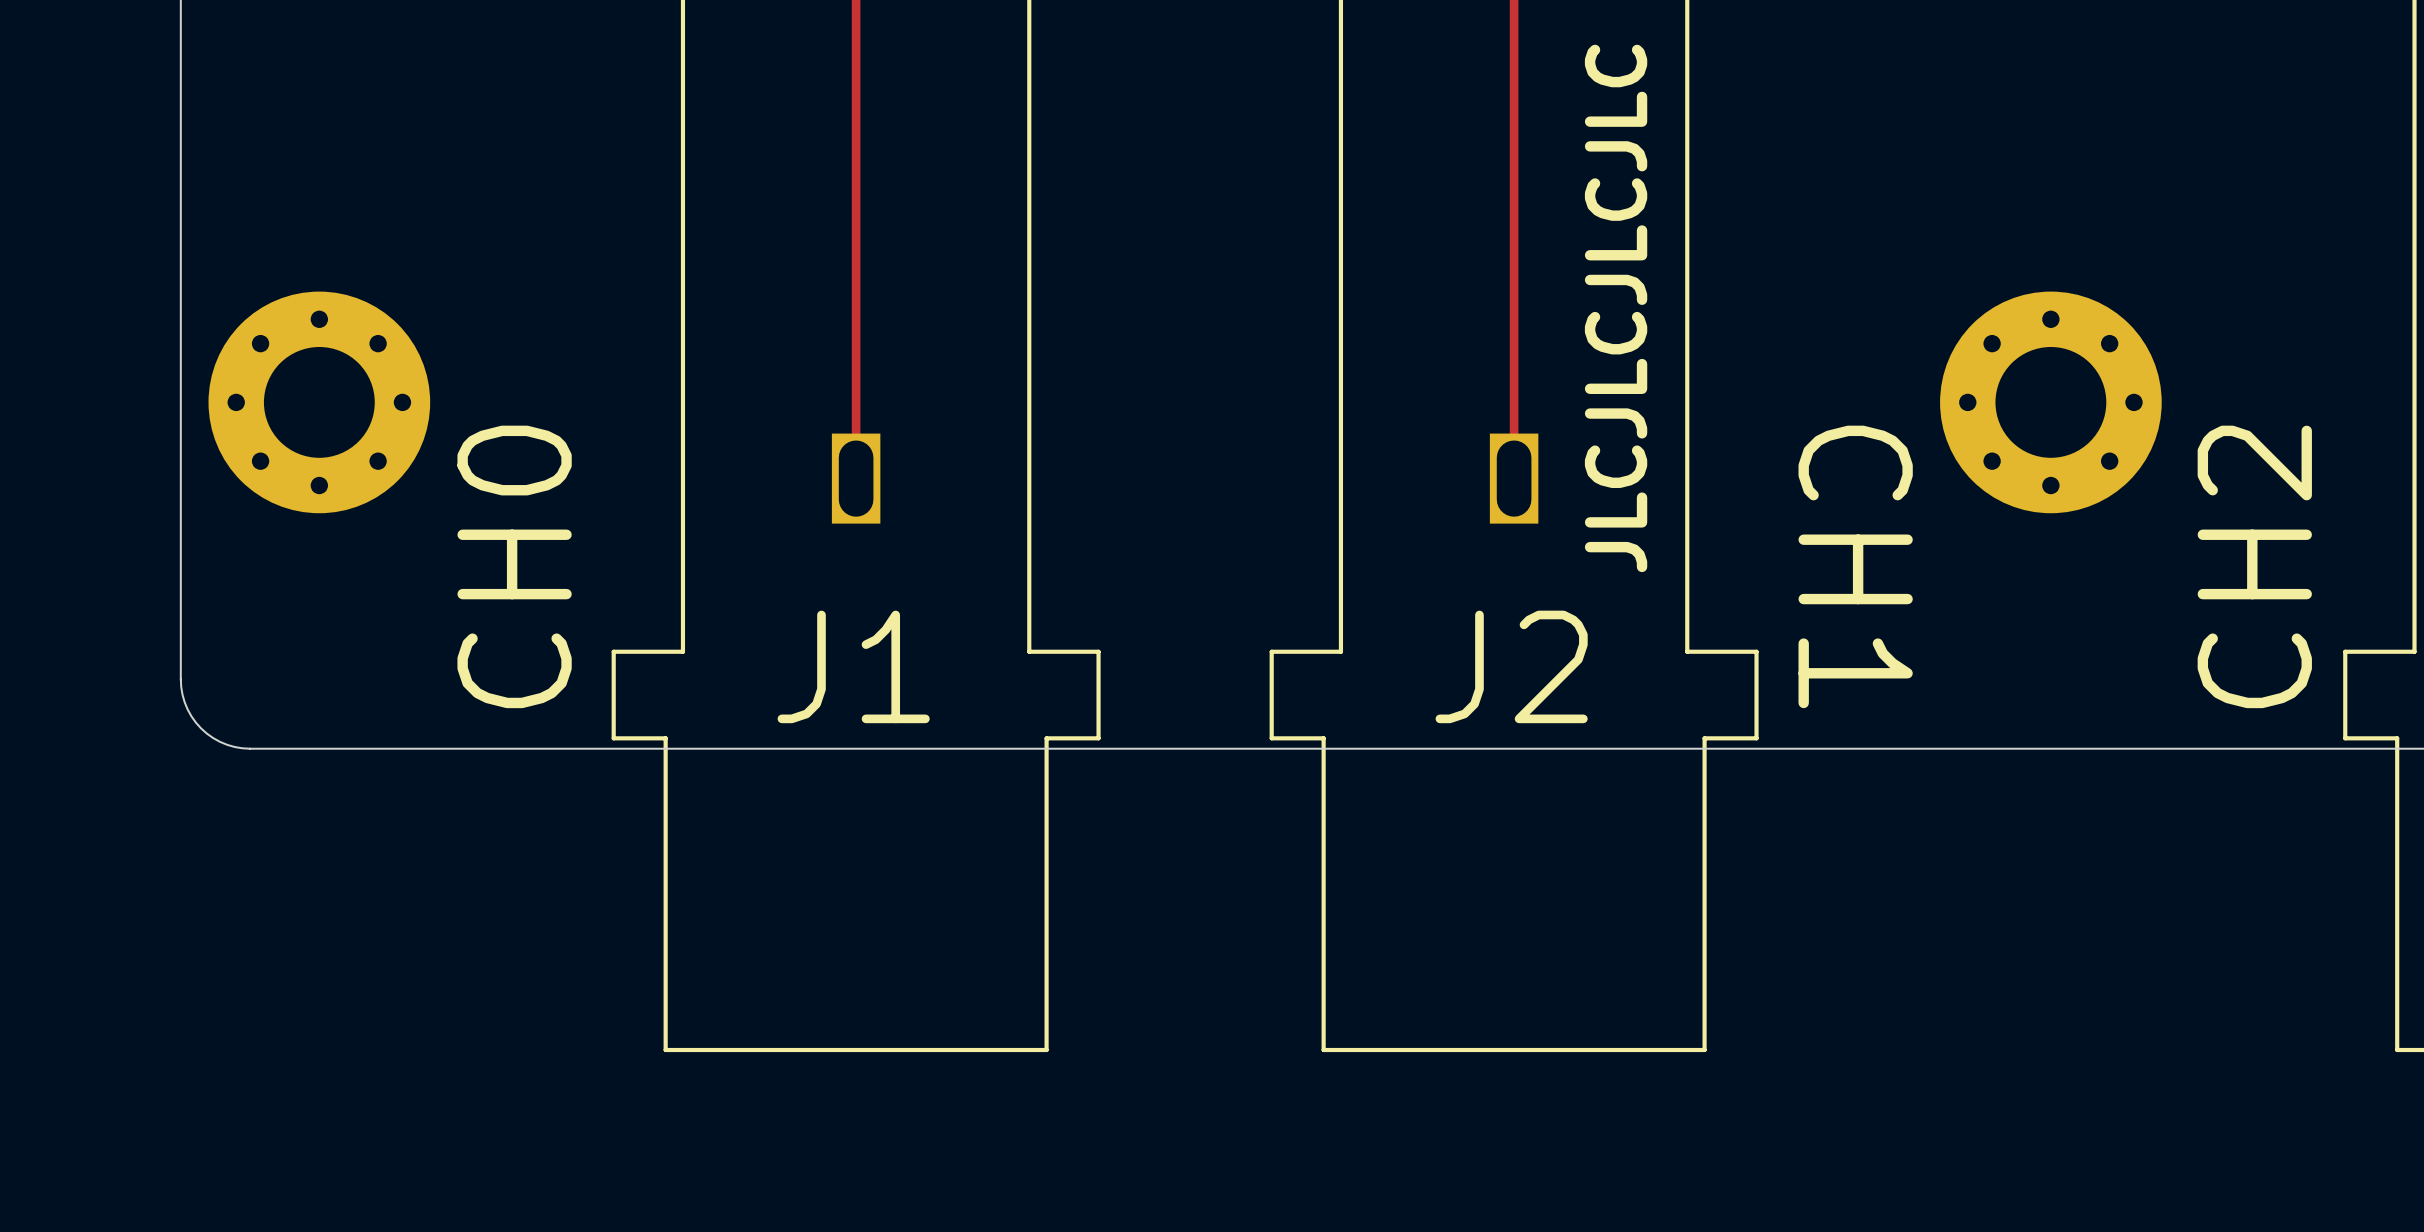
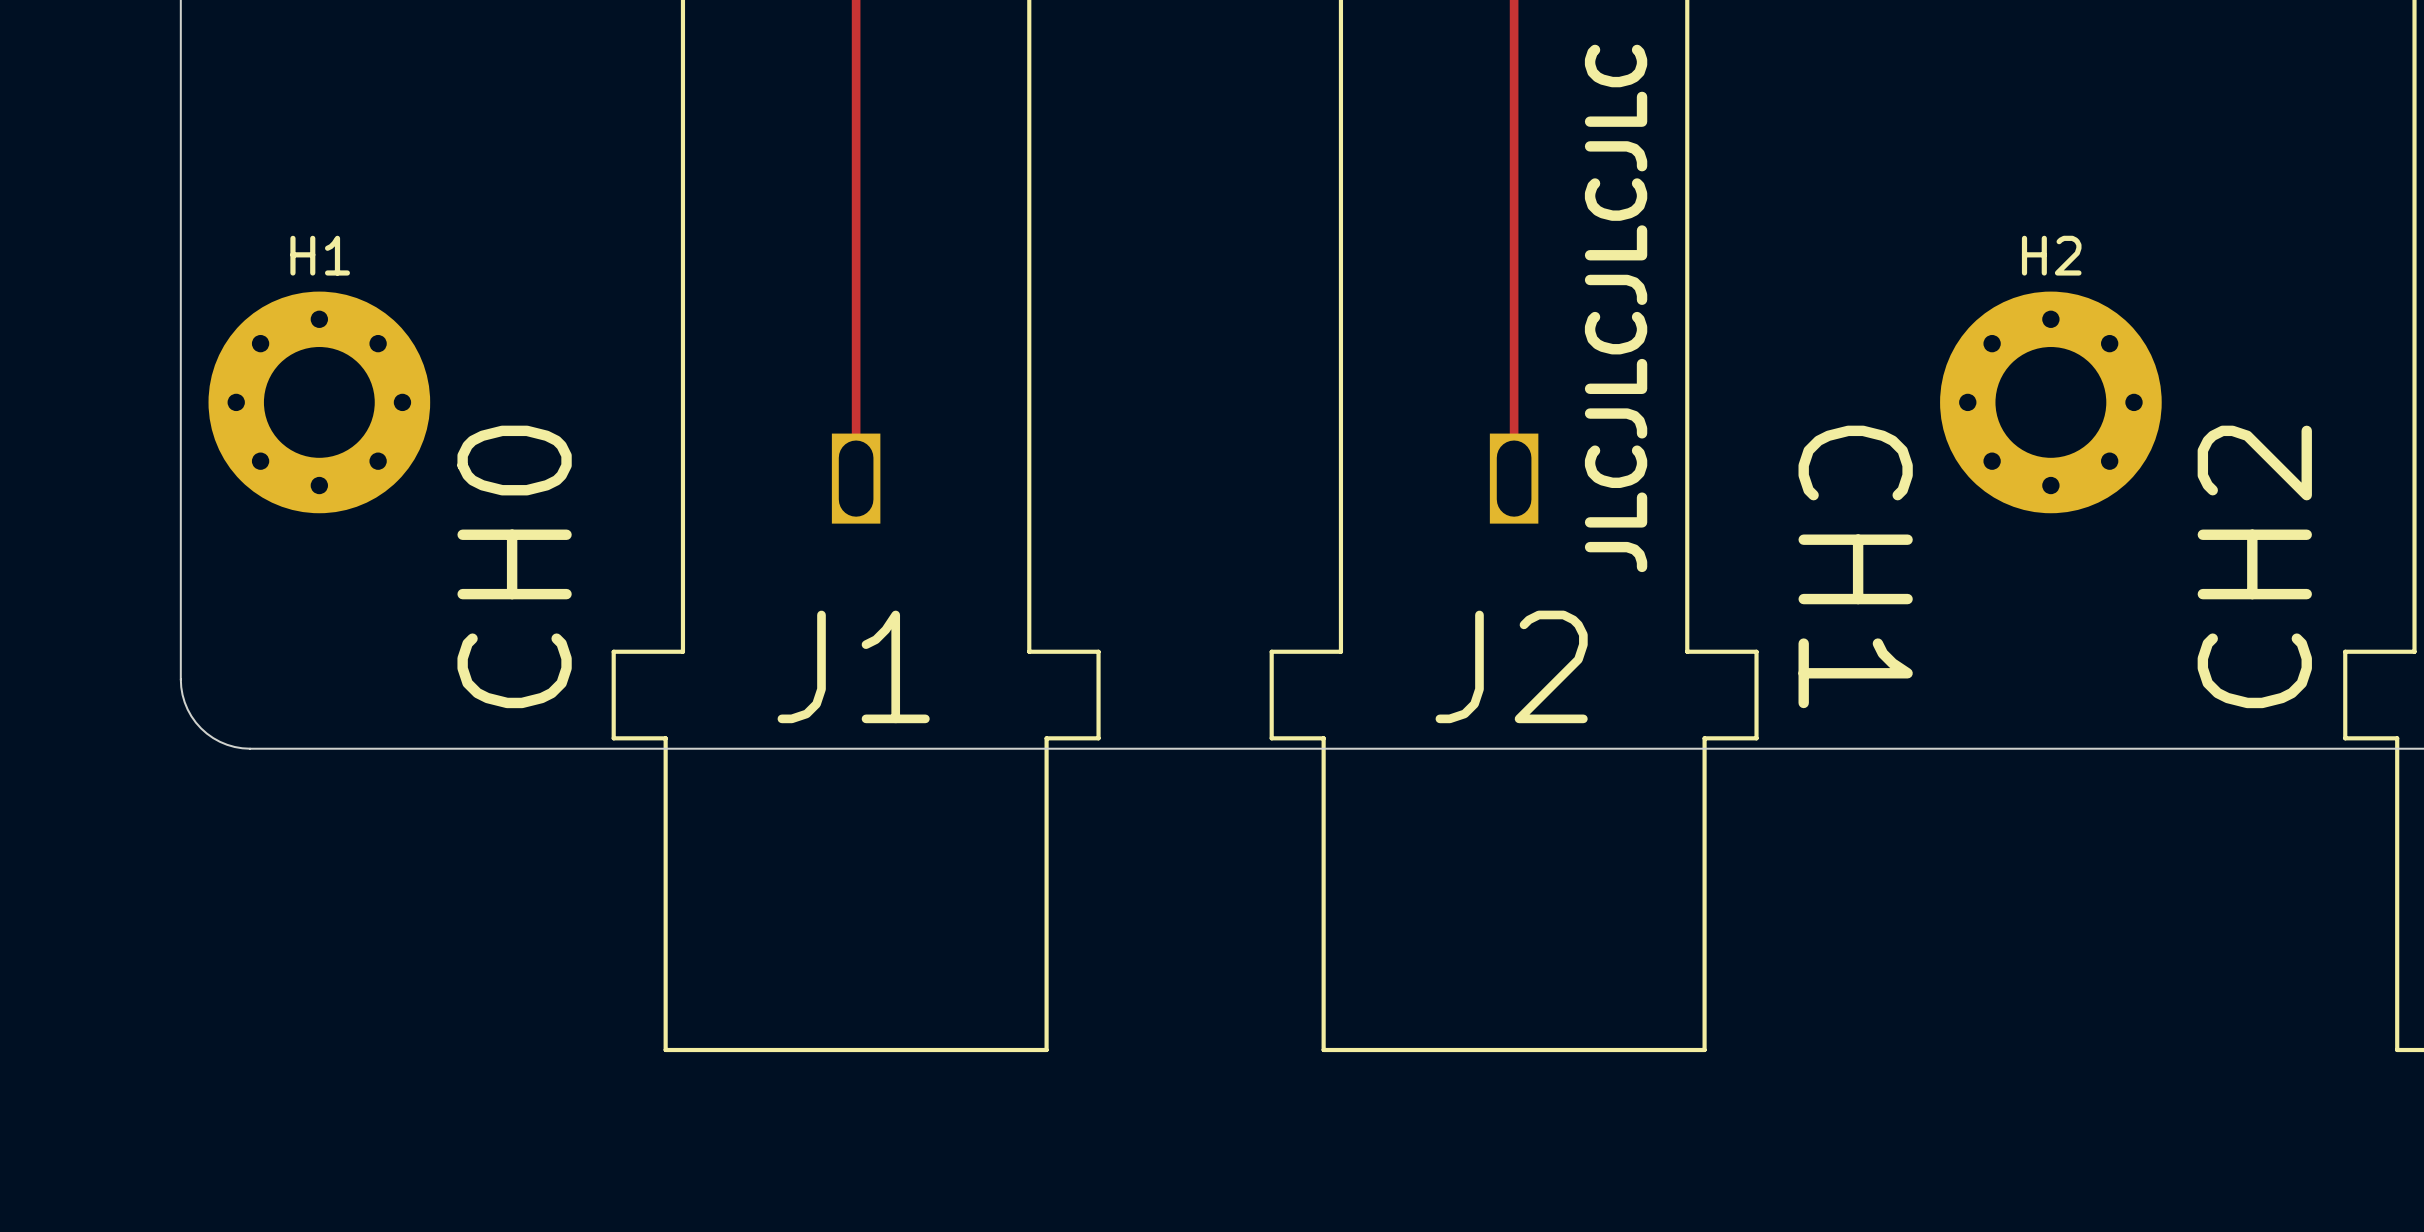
H1 name: none -> H1 (320, 255)
H2 name: none -> H2 (2051, 255)

